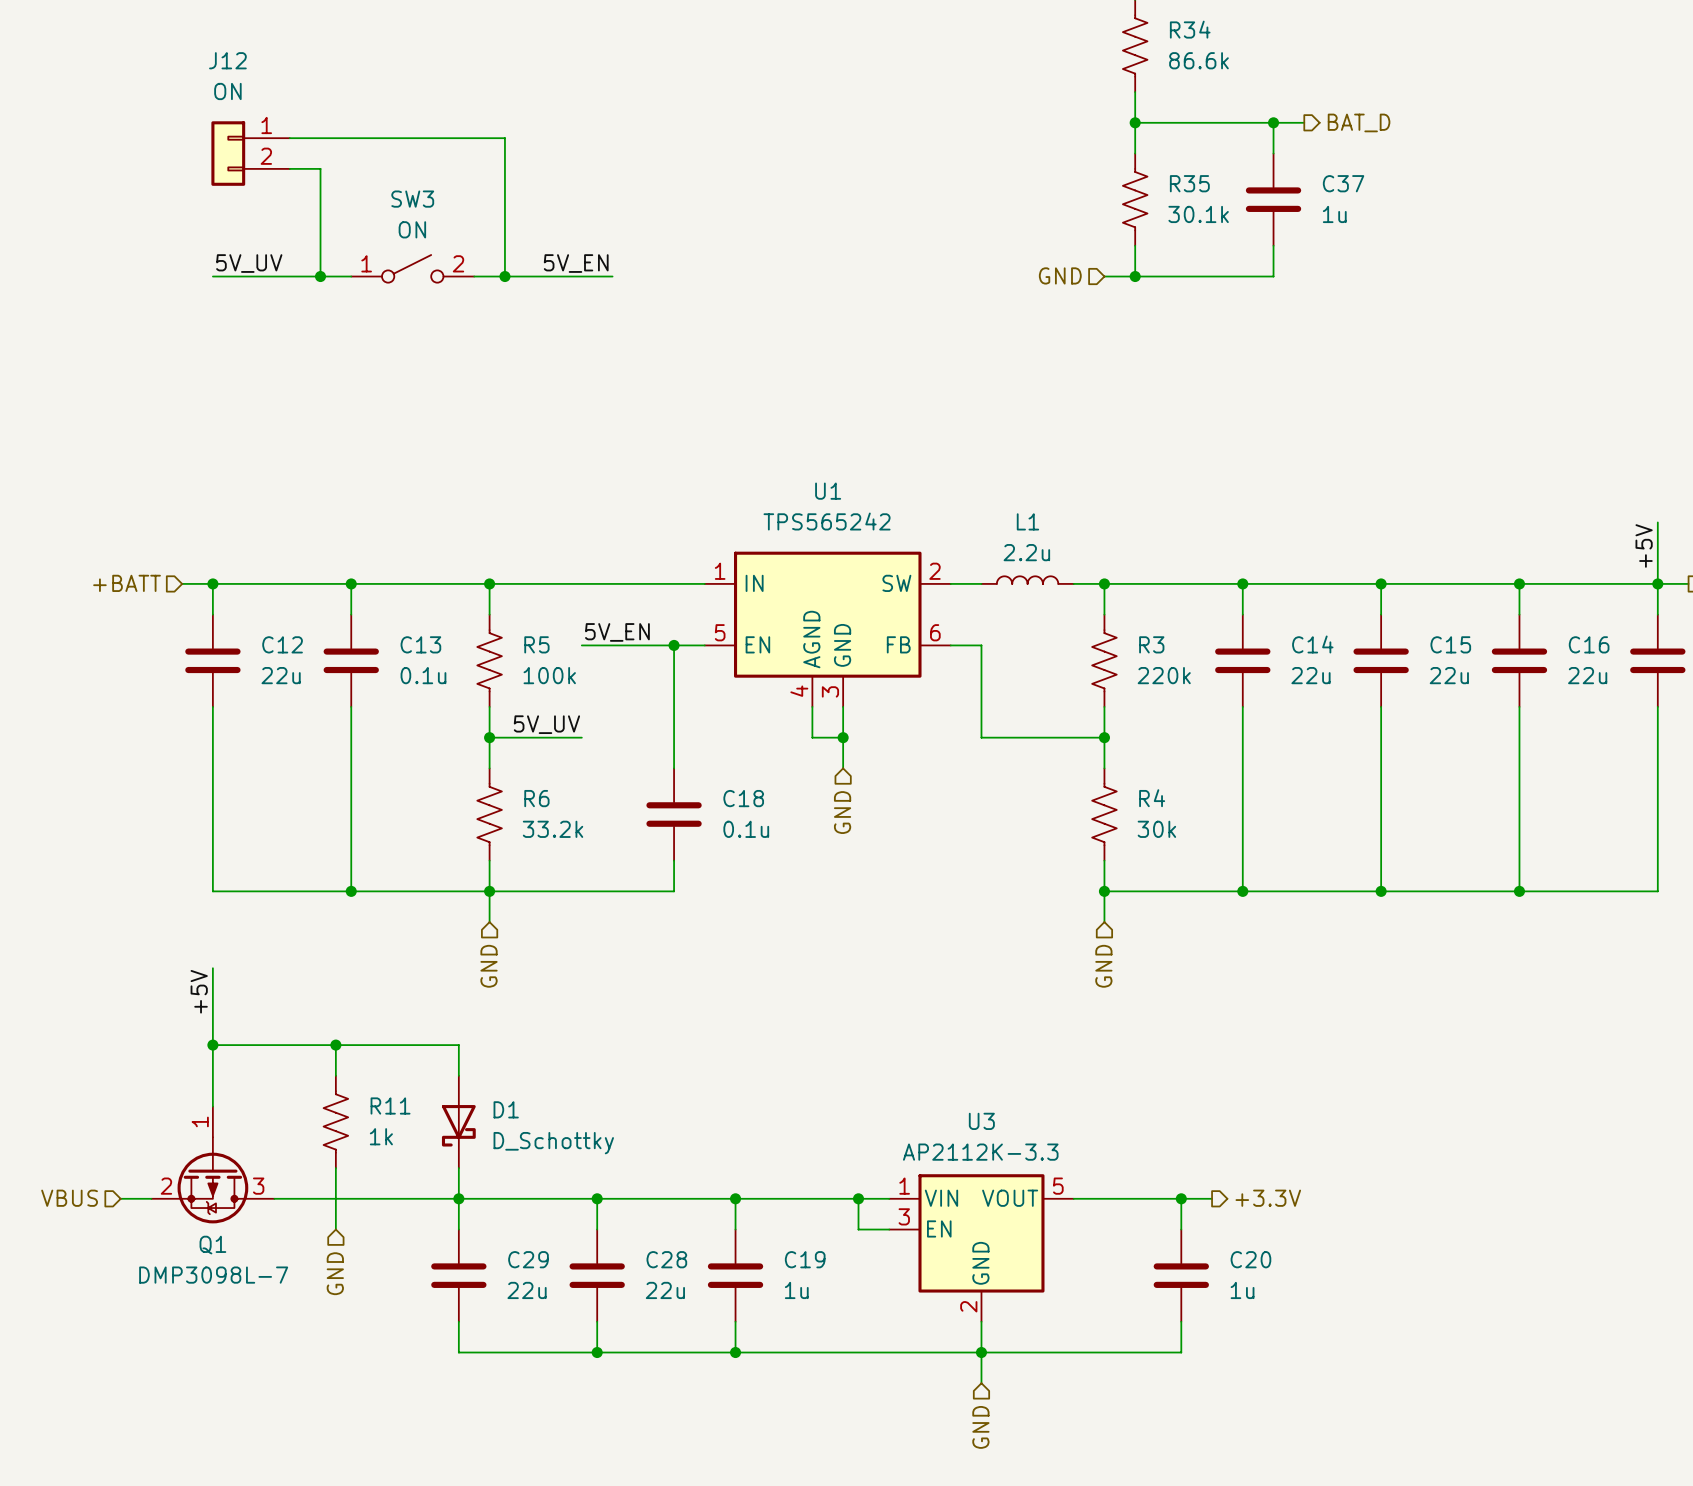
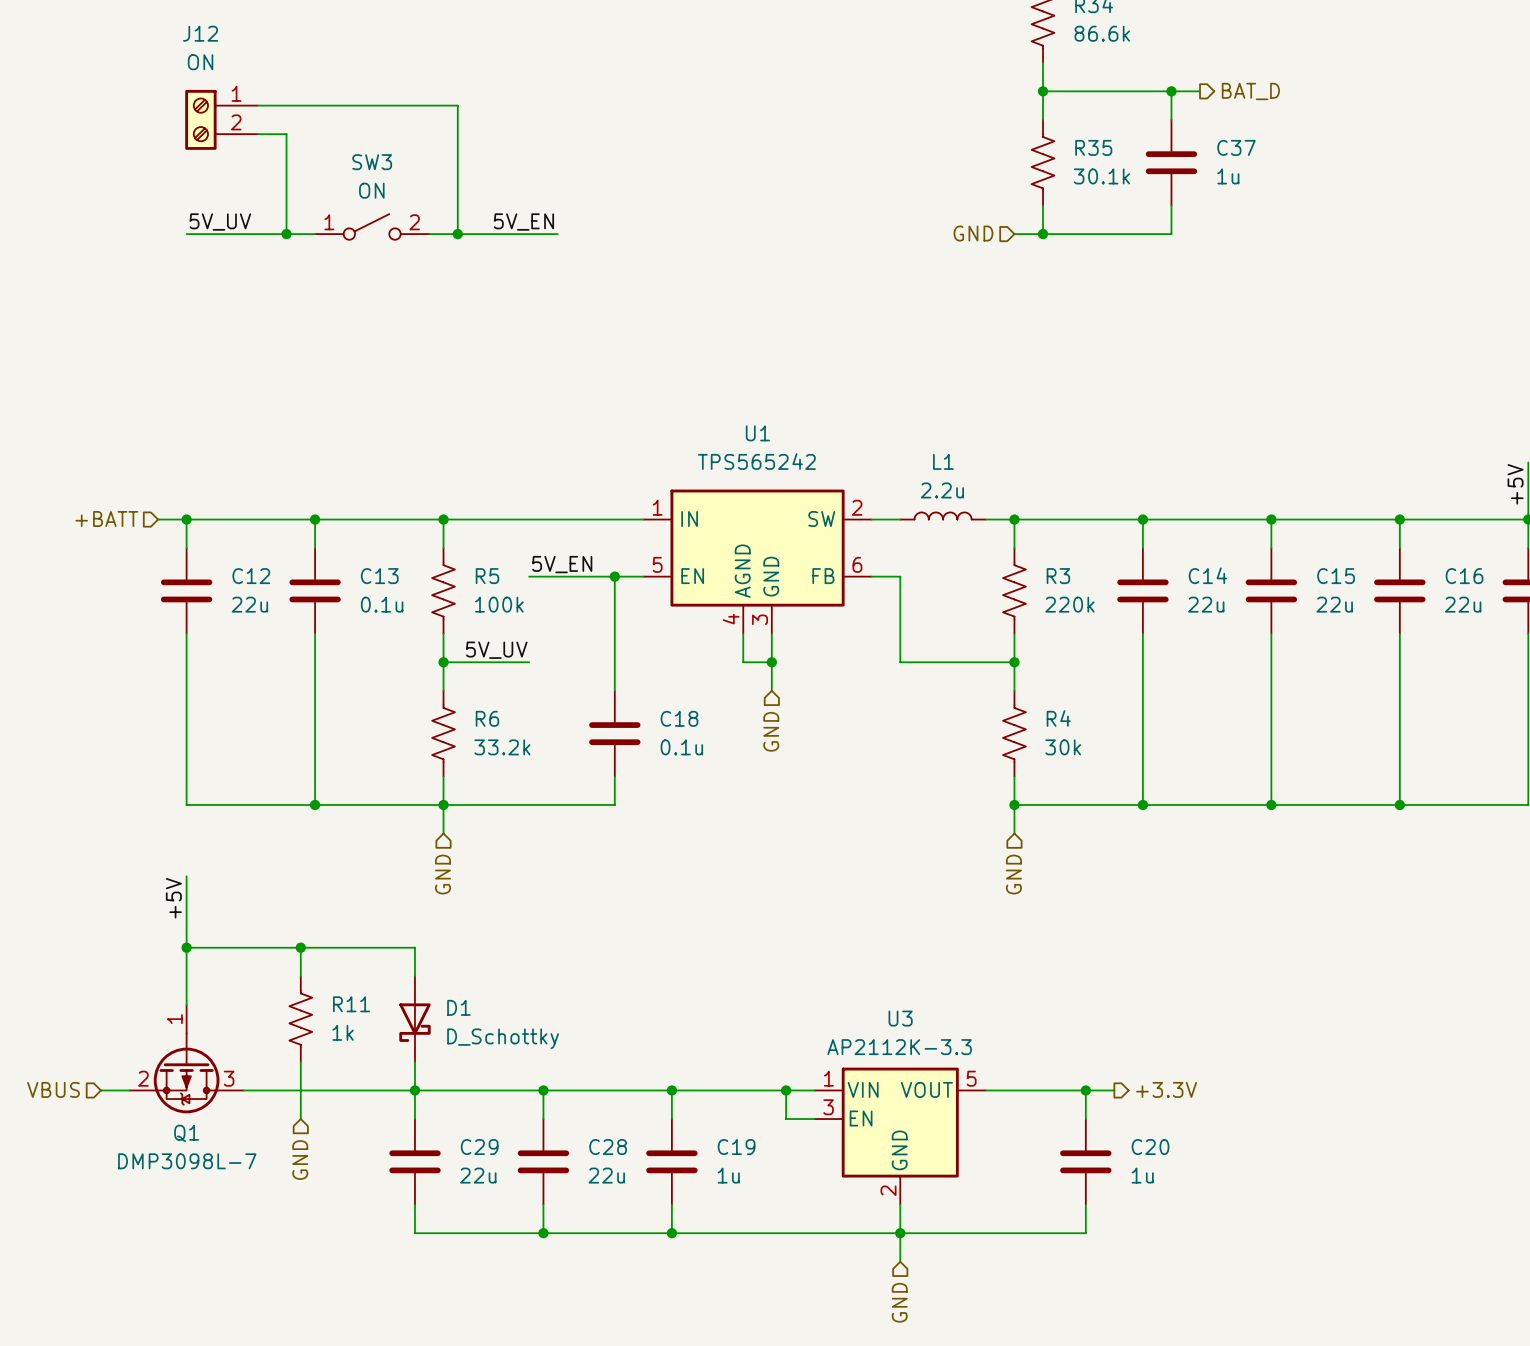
J12 symbol: [211, 121, 290, 186] -> [185, 89, 258, 150]

